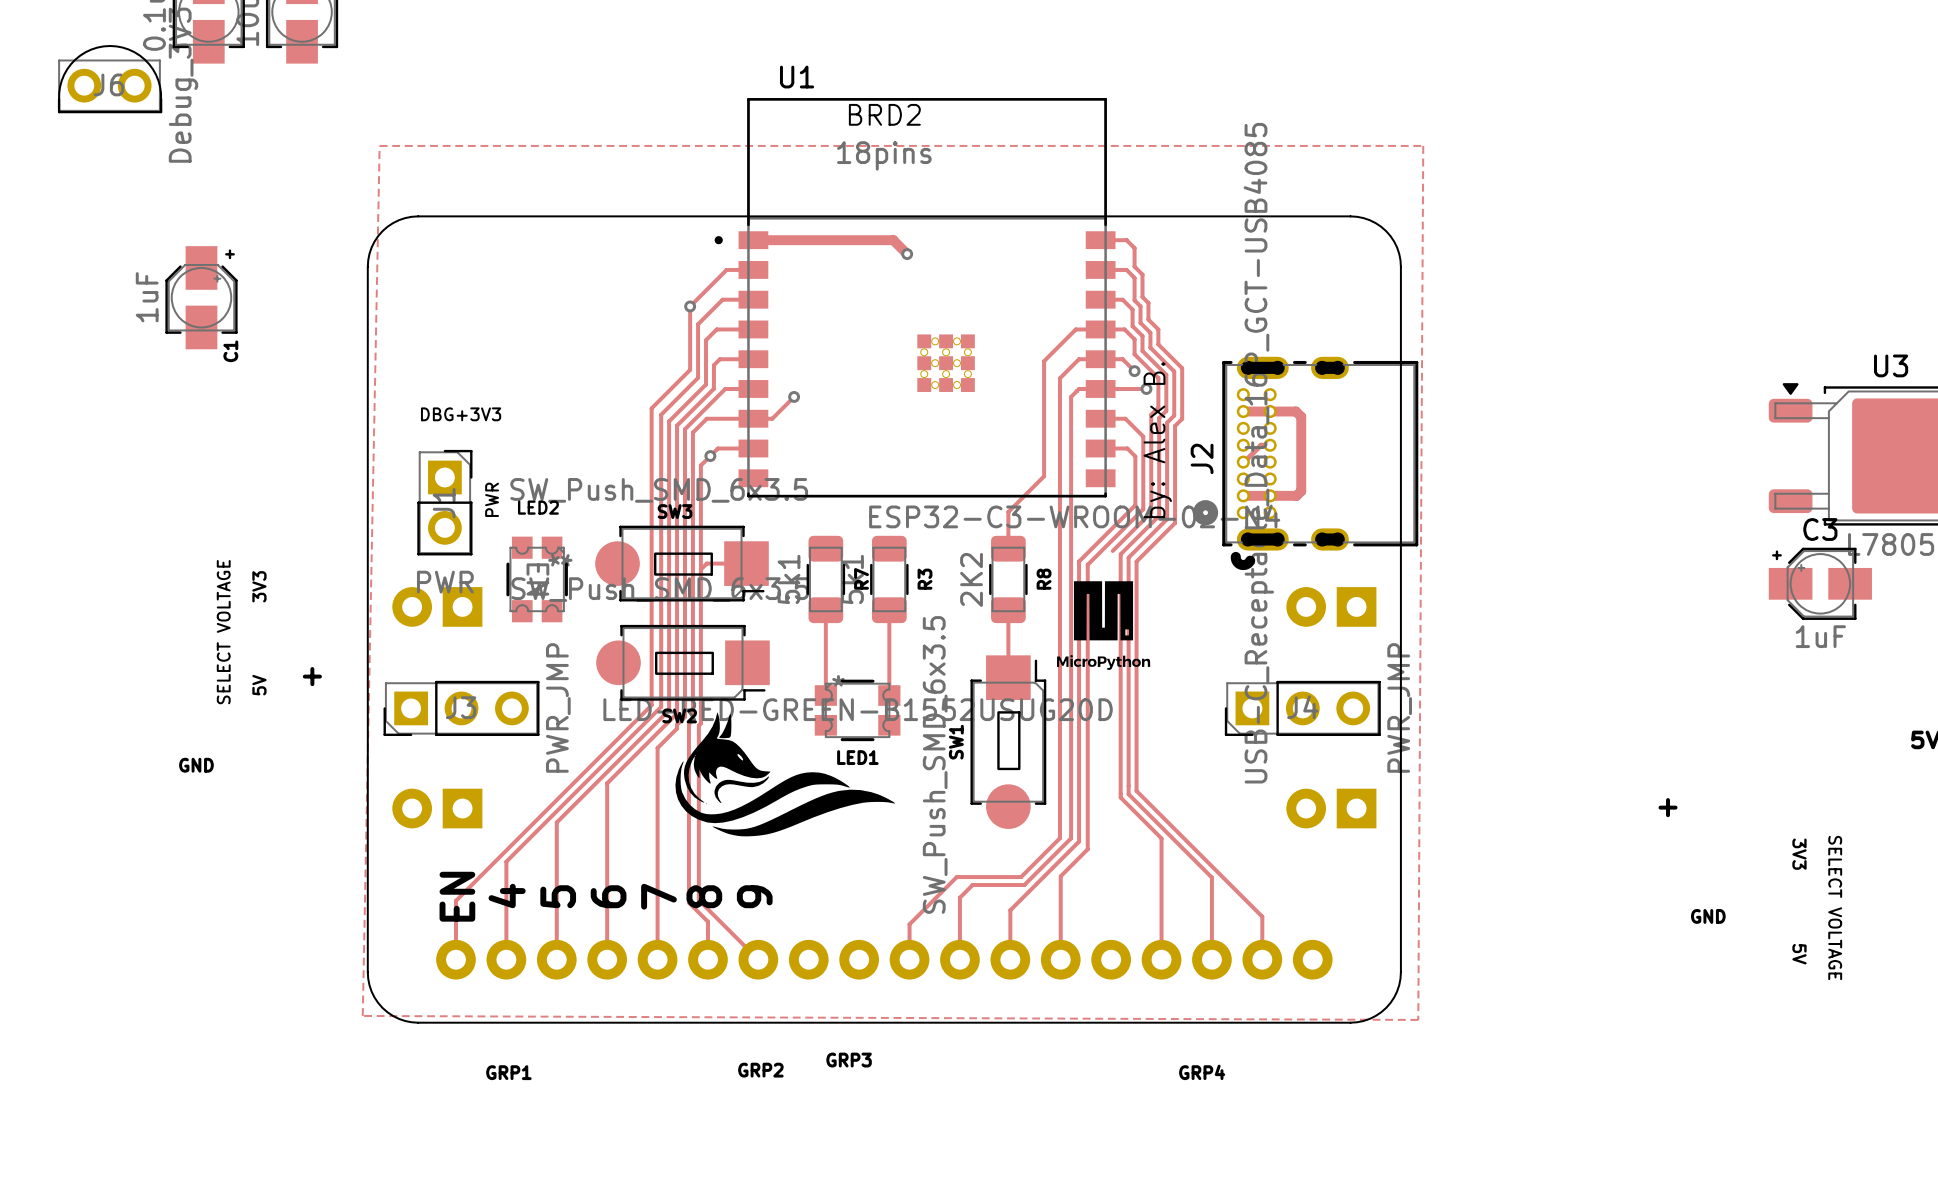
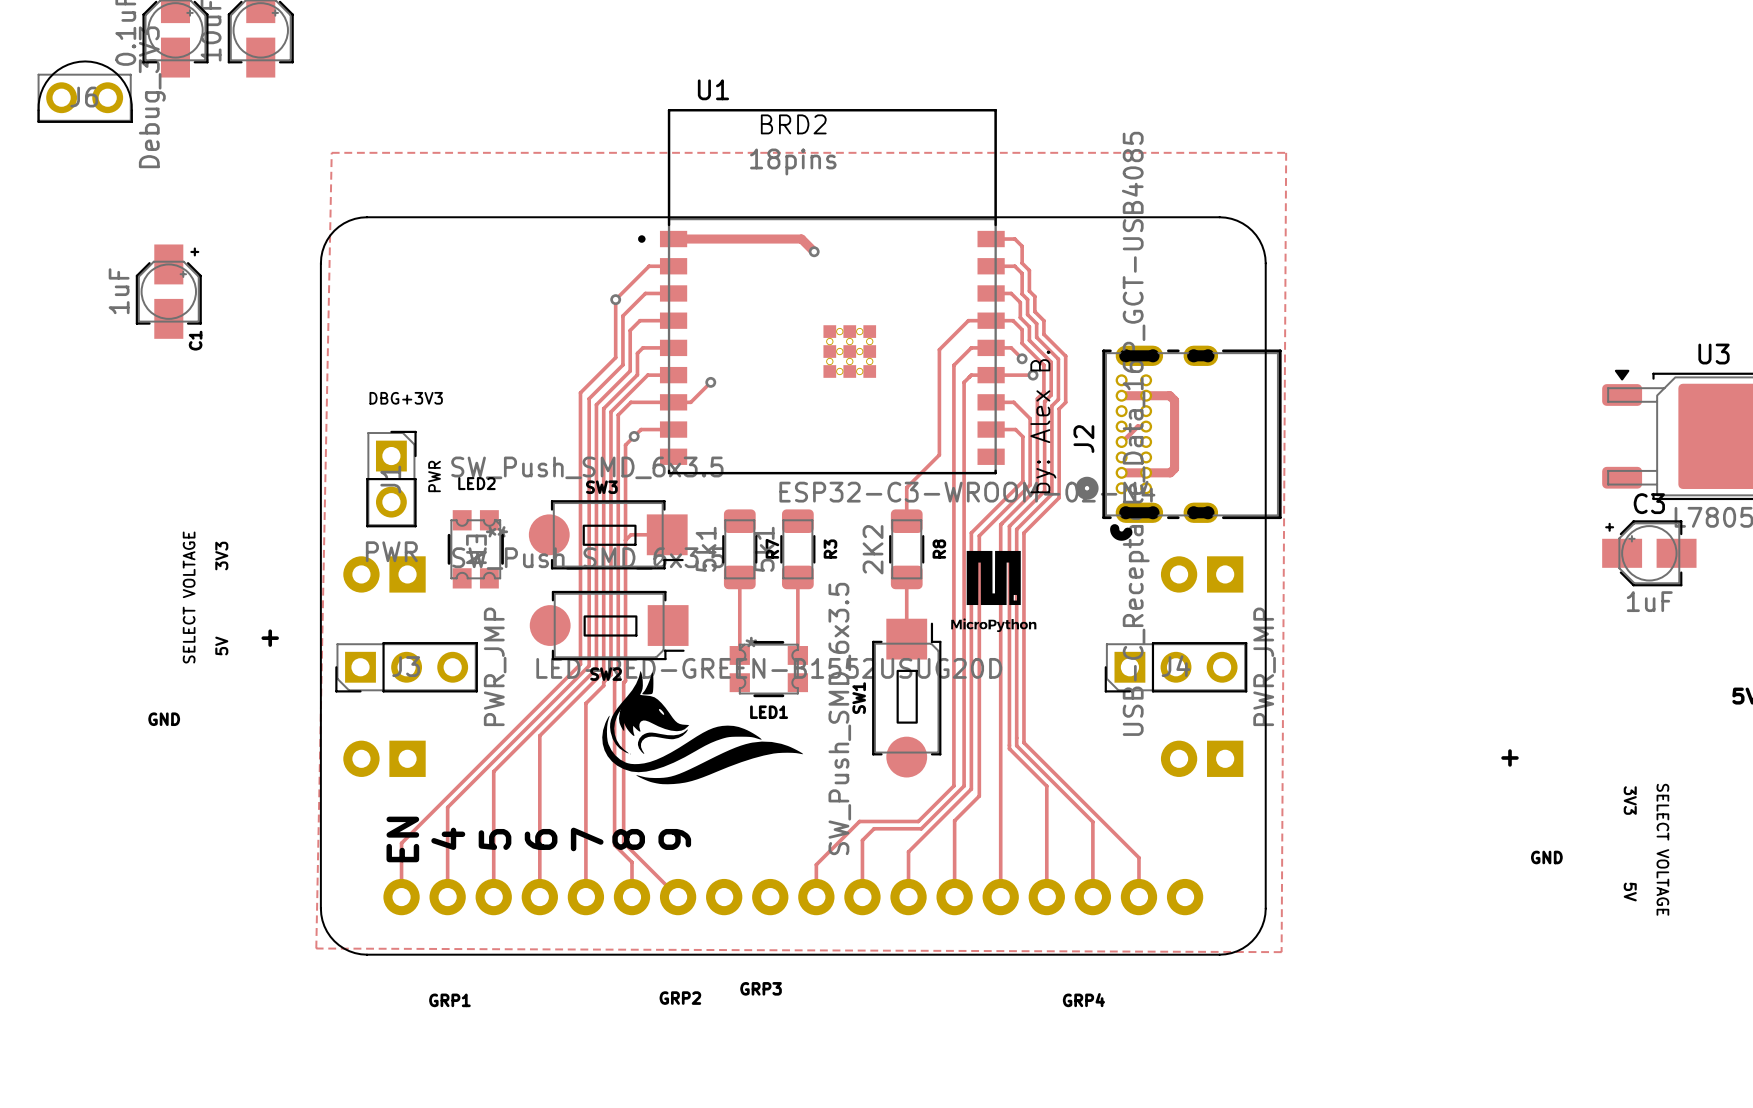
track: none -> (1002, 523) (1000, 897)

